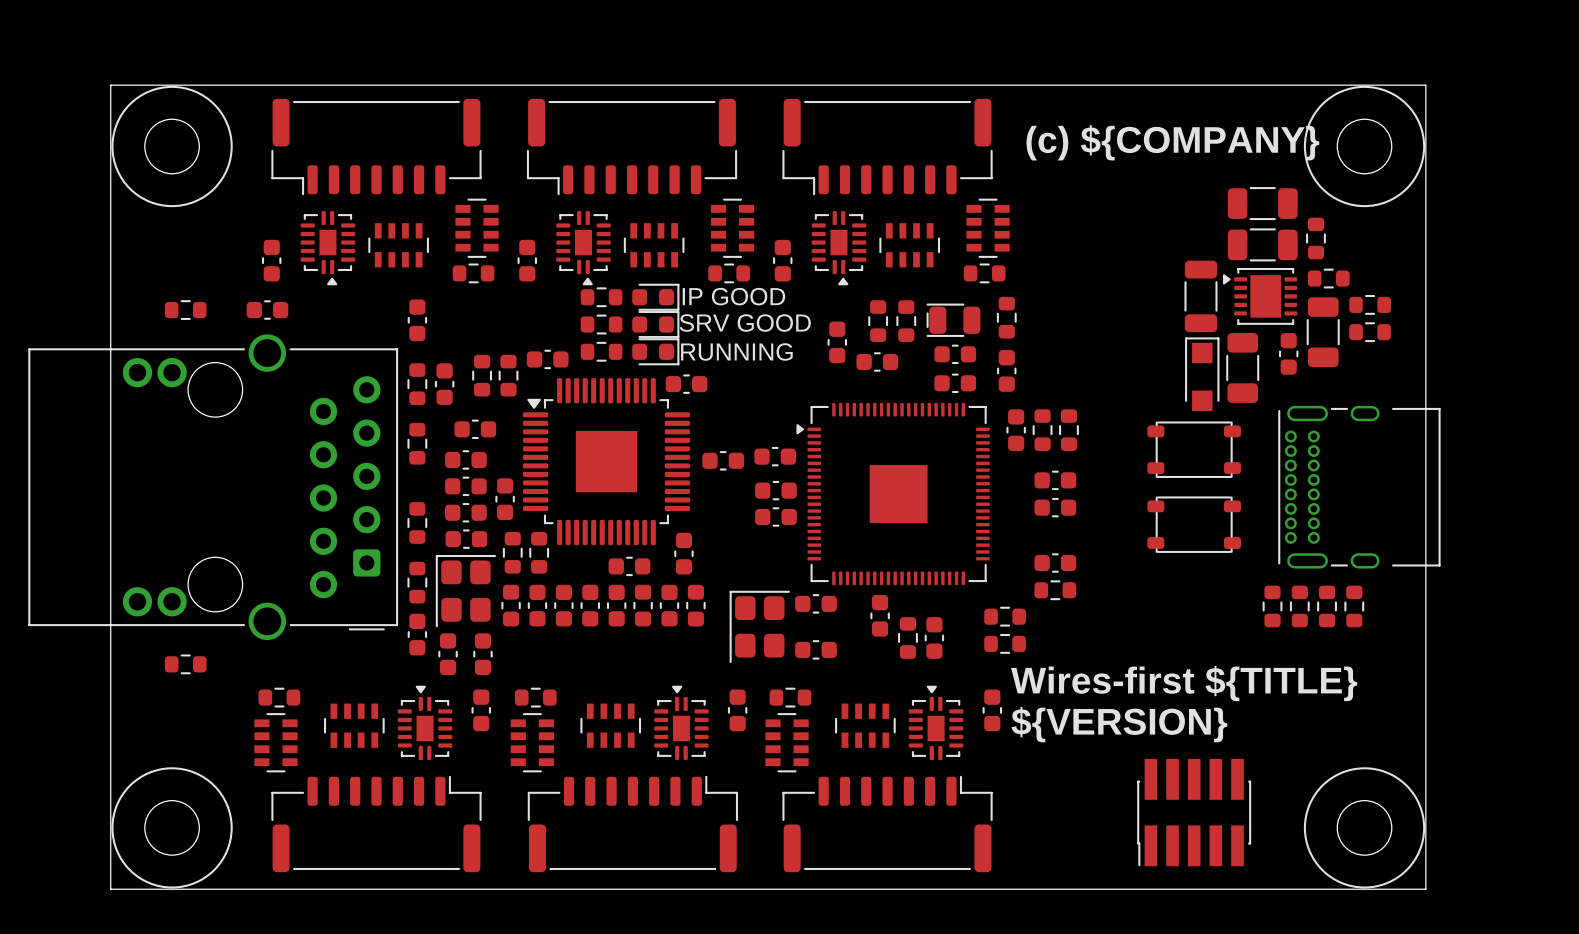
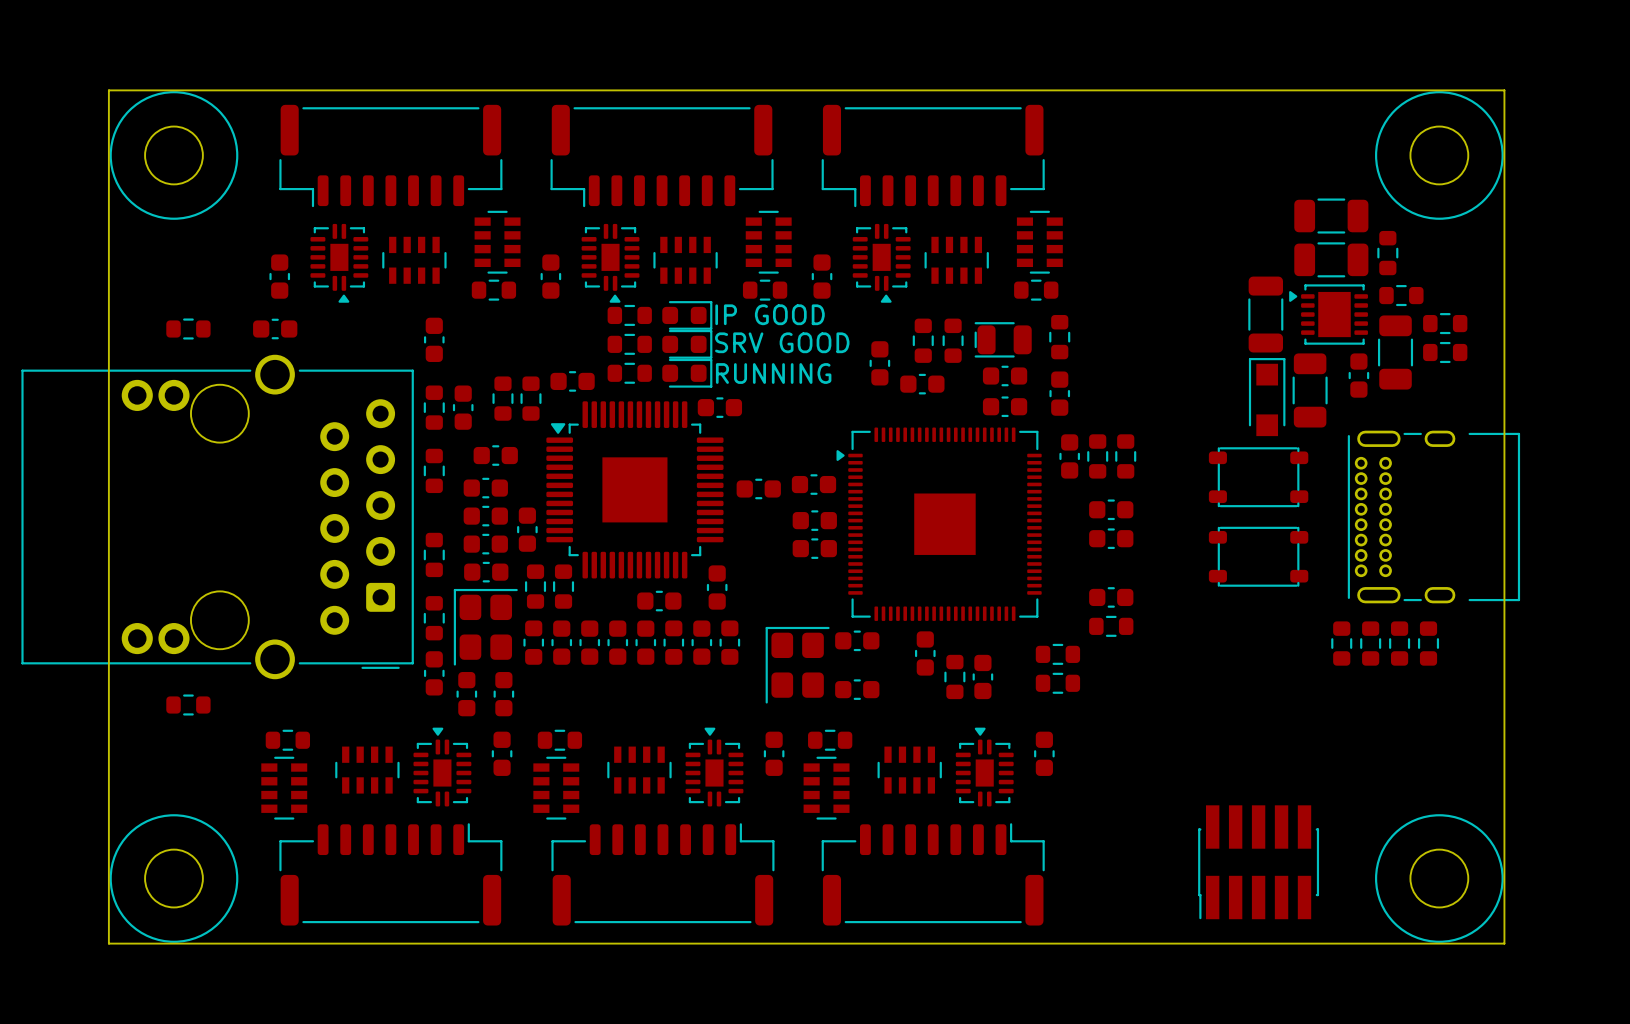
text: (c) ${COMPANY} (1172, 142) -> none
text: Wires-first ${TITLE} (1184, 683) -> none
text: ${VERSION} (1119, 724) -> none

